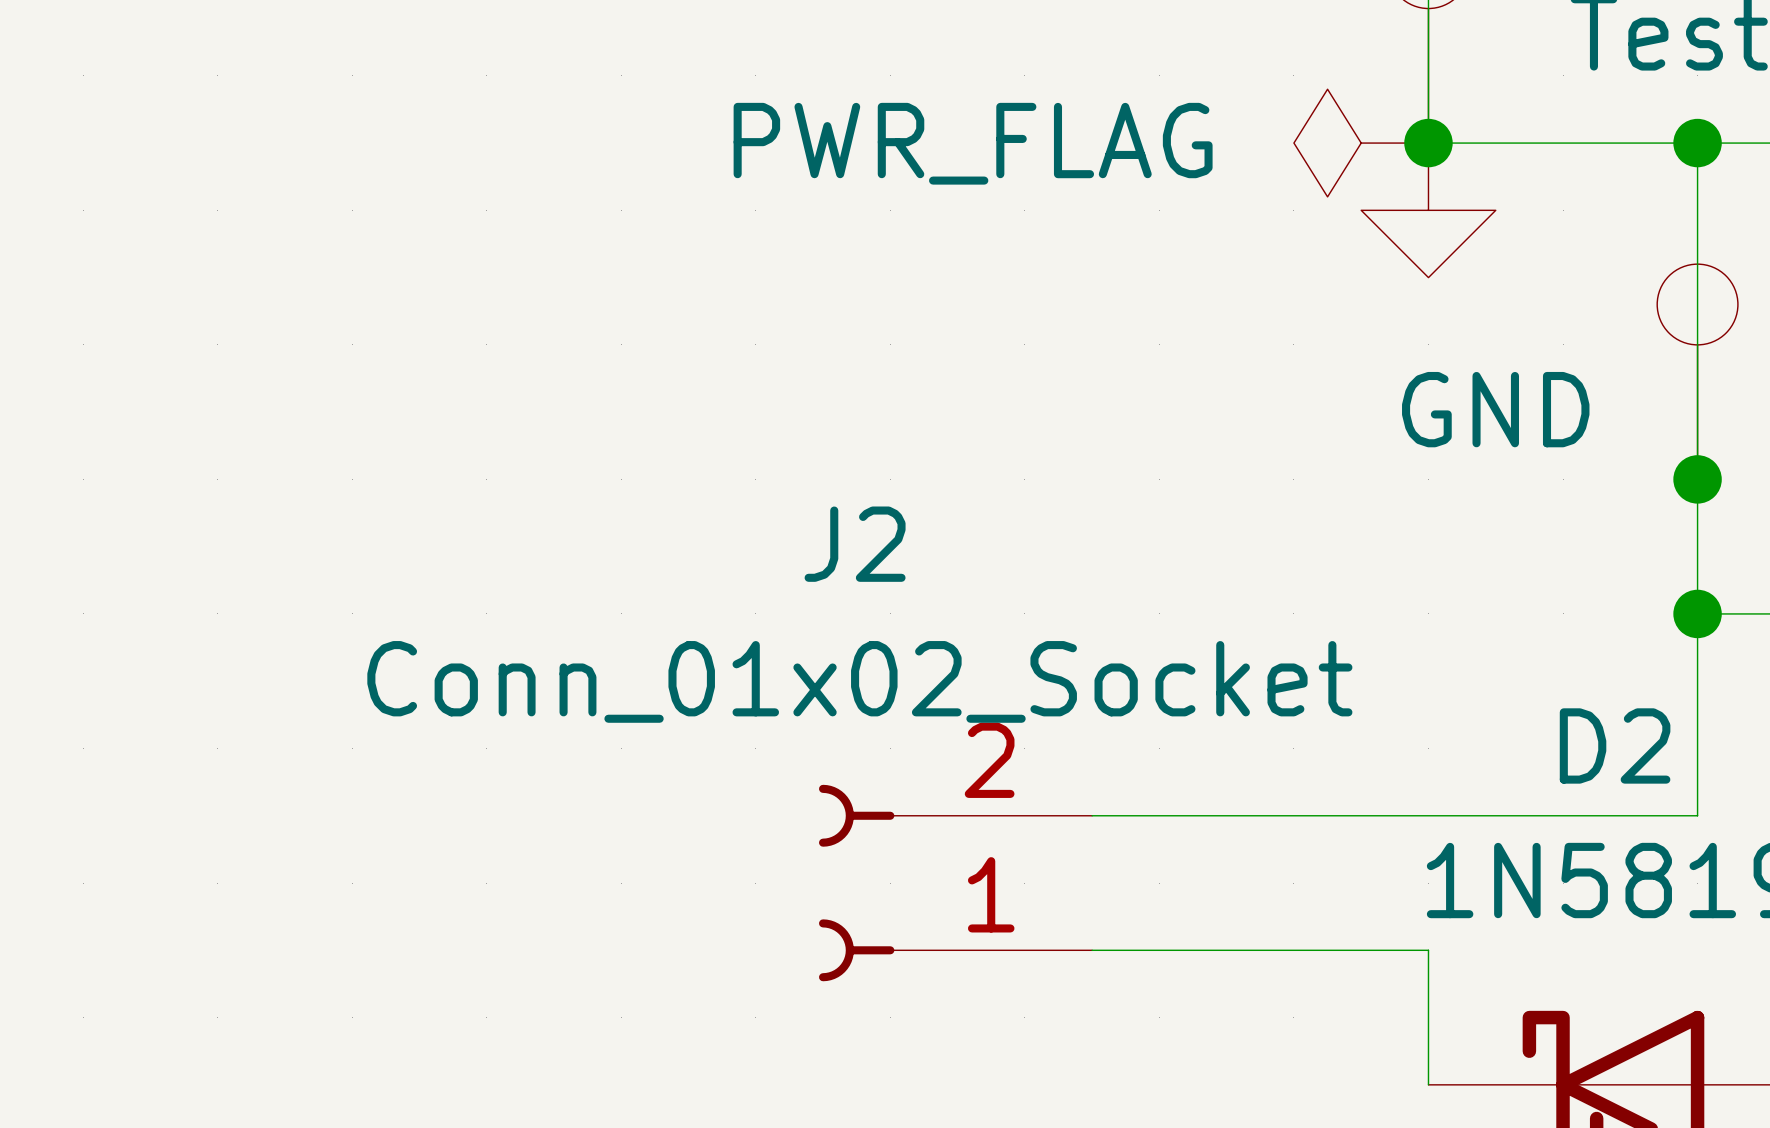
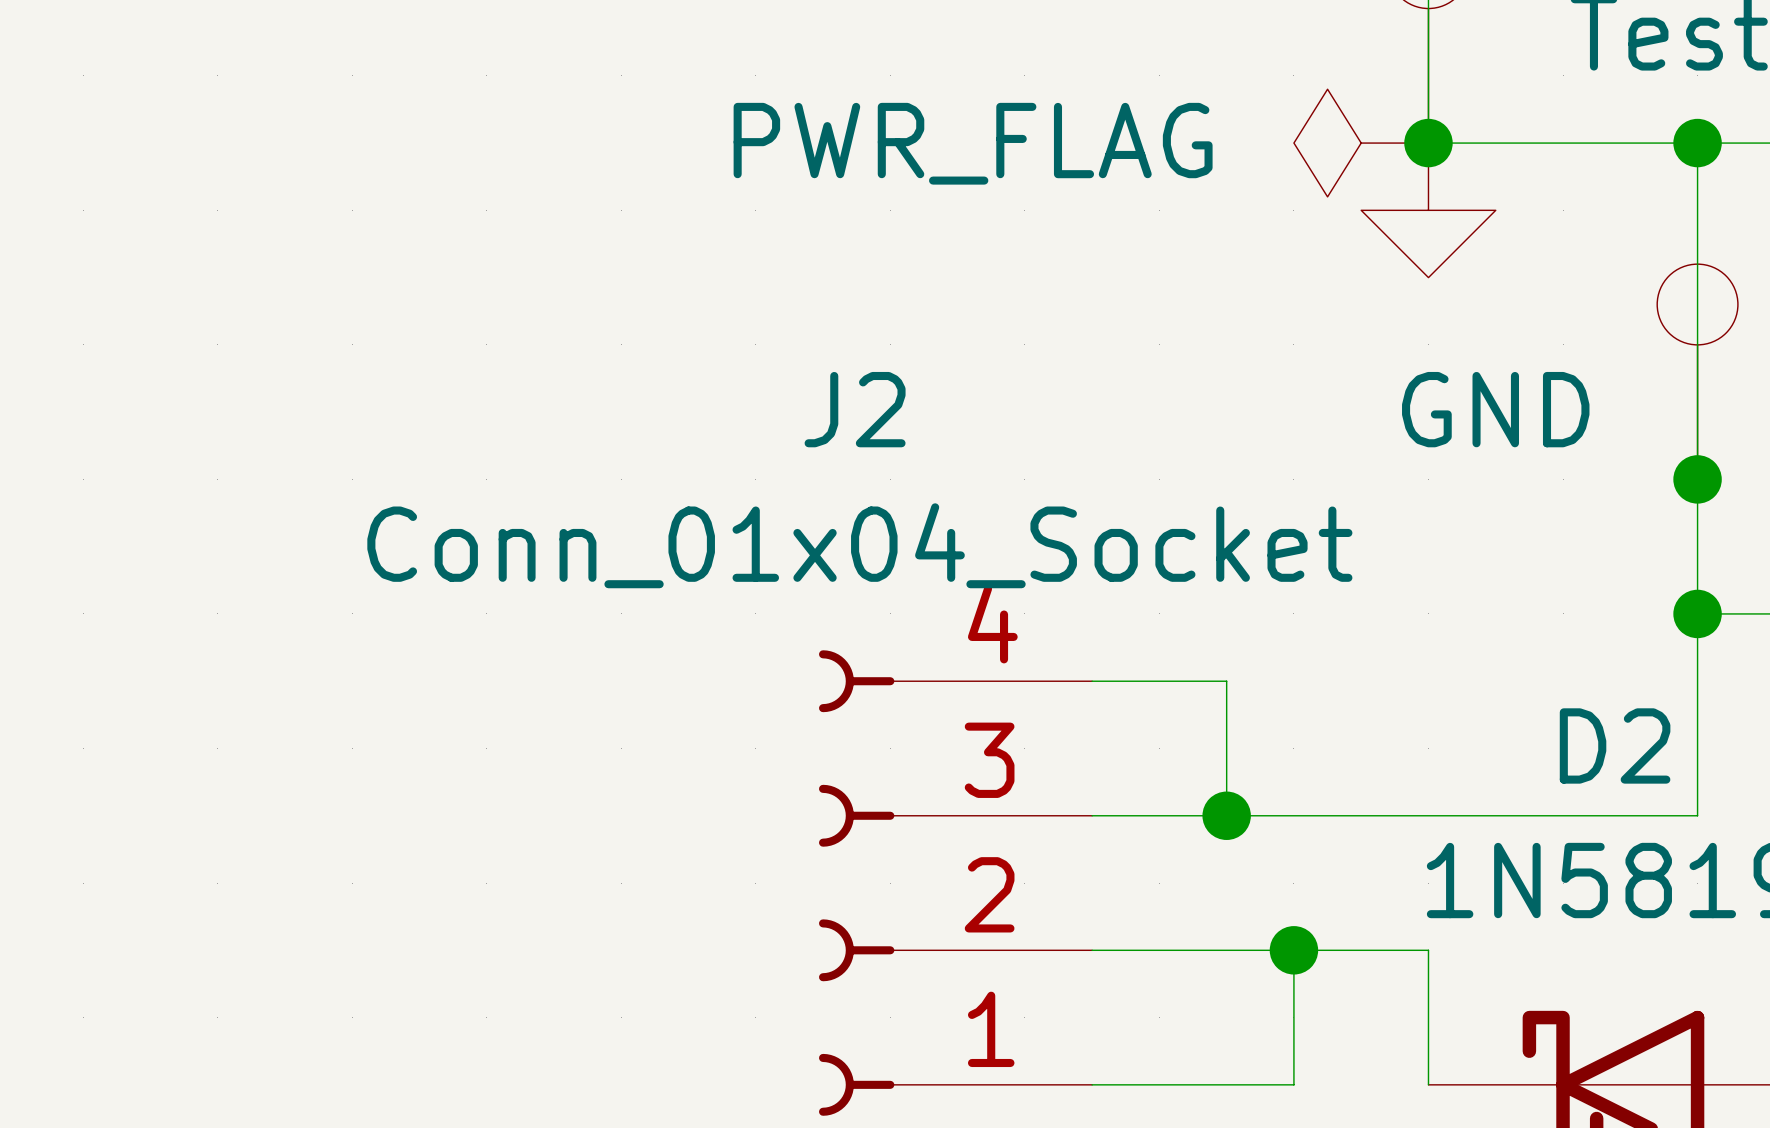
J2 name position: J2 (855, 544) -> J2 (855, 409)
J2 value: Conn_01x02_Socket (859, 681) -> Conn_01x04_Socket (859, 545)
wire: none -> (1092, 681) (1226, 681) (1226, 815)
J2 symbol: [819, 784, 1093, 982] -> [819, 650, 1093, 1116]
junction: none -> (1226, 815)
wire: none -> (1293, 950) (1293, 1084) (1092, 1084)
junction: none -> (1293, 950)

